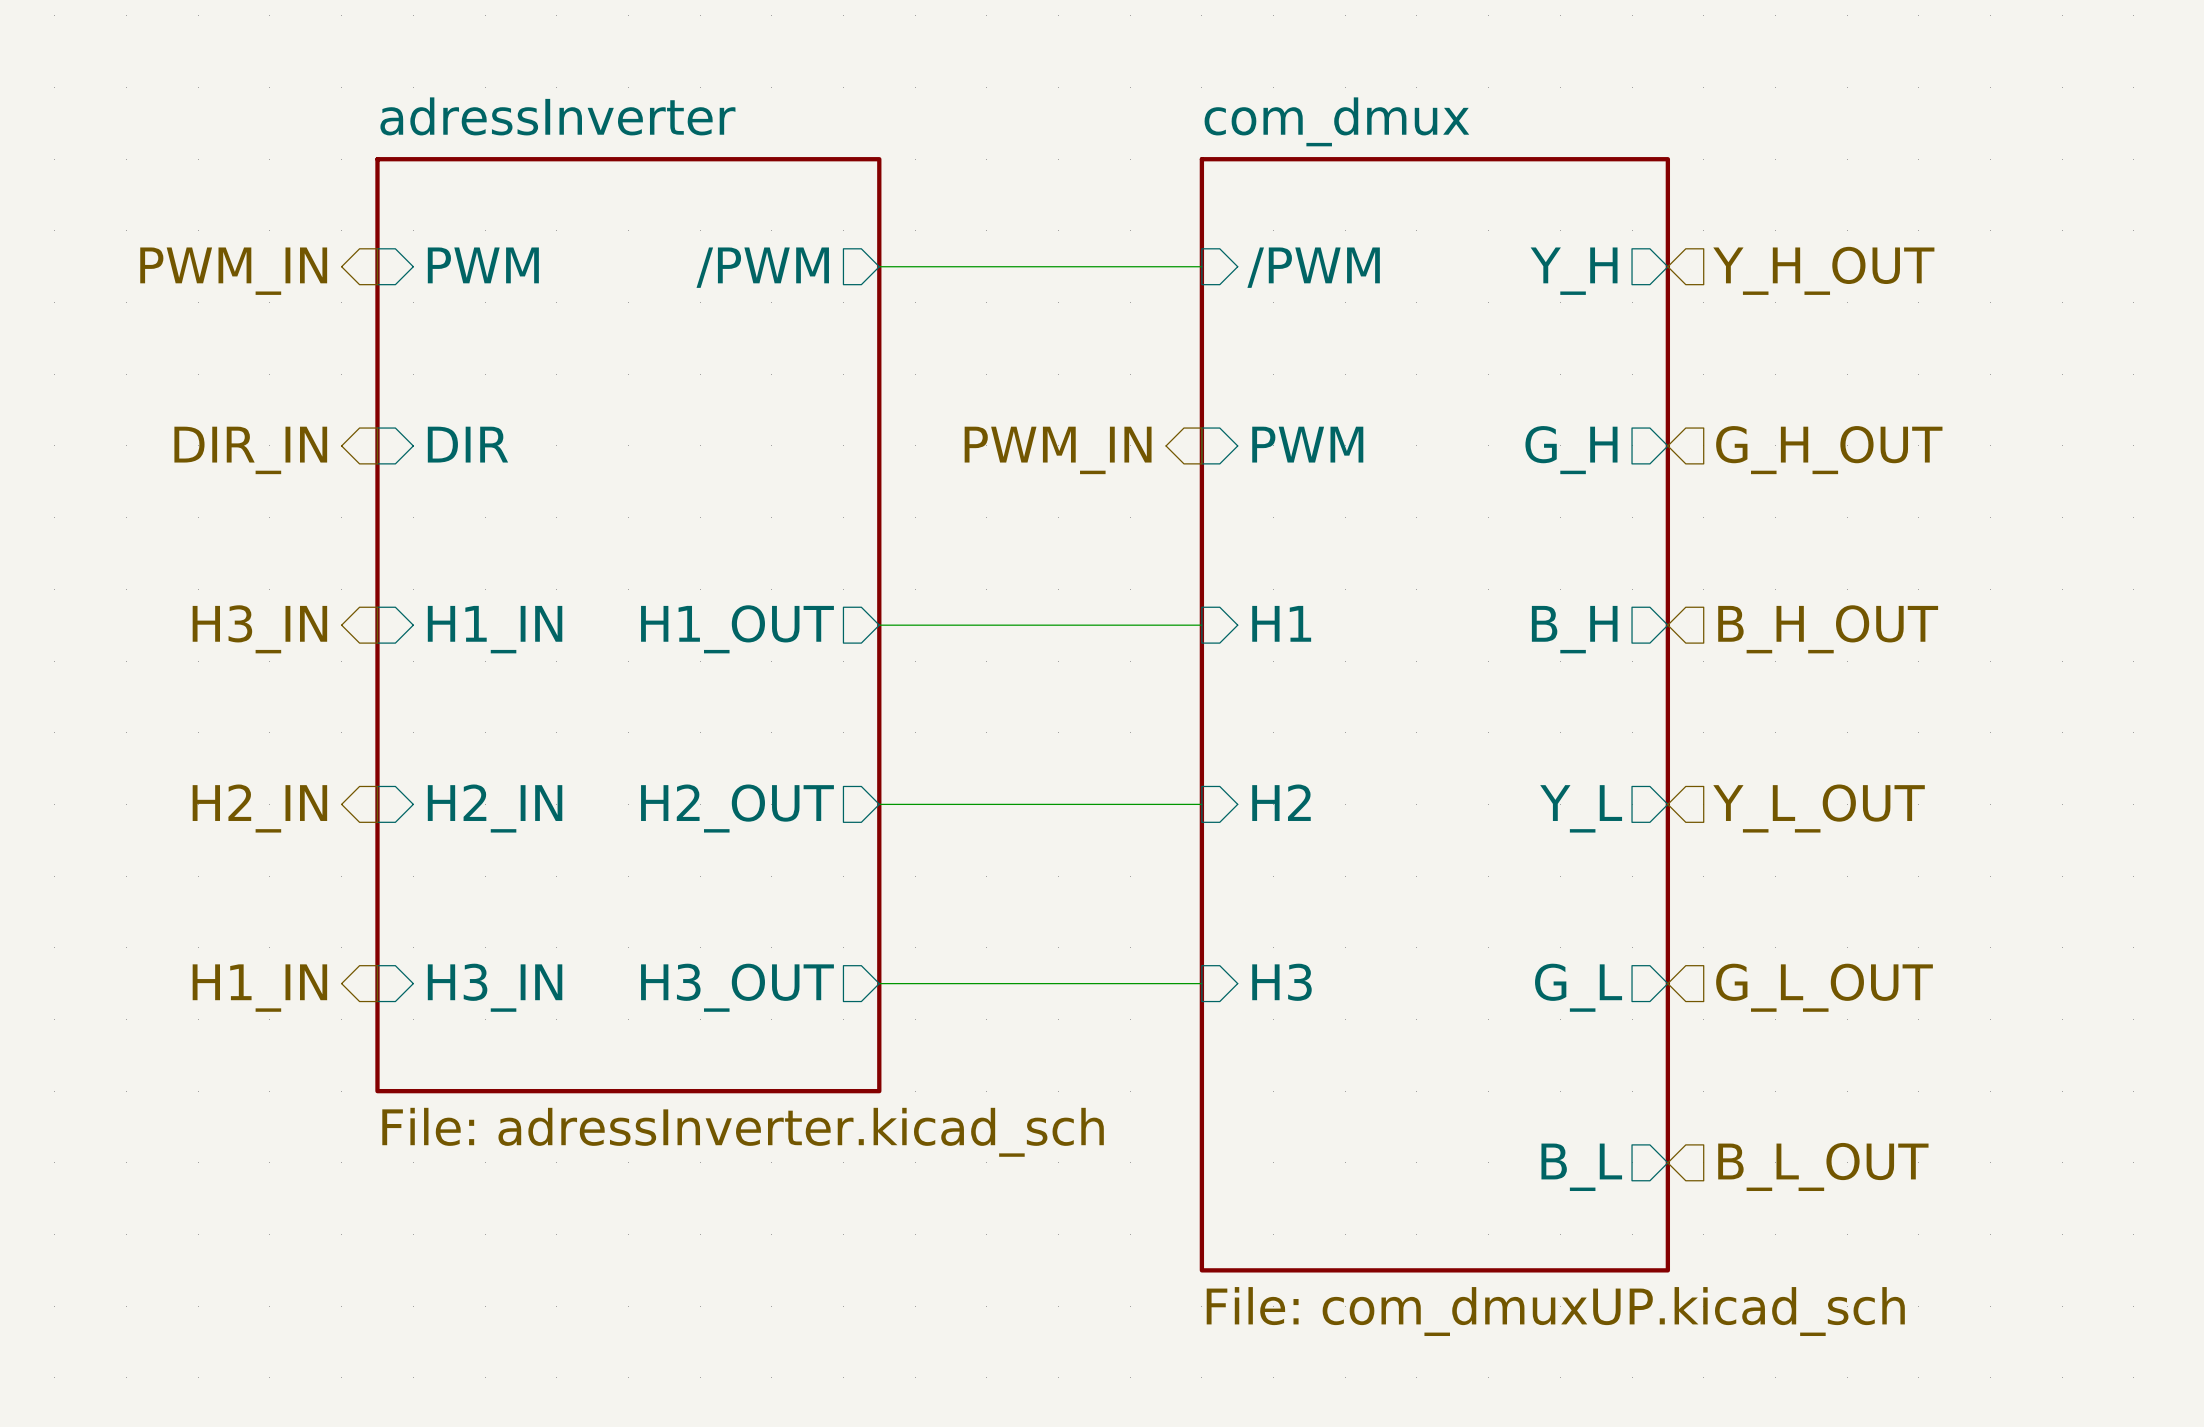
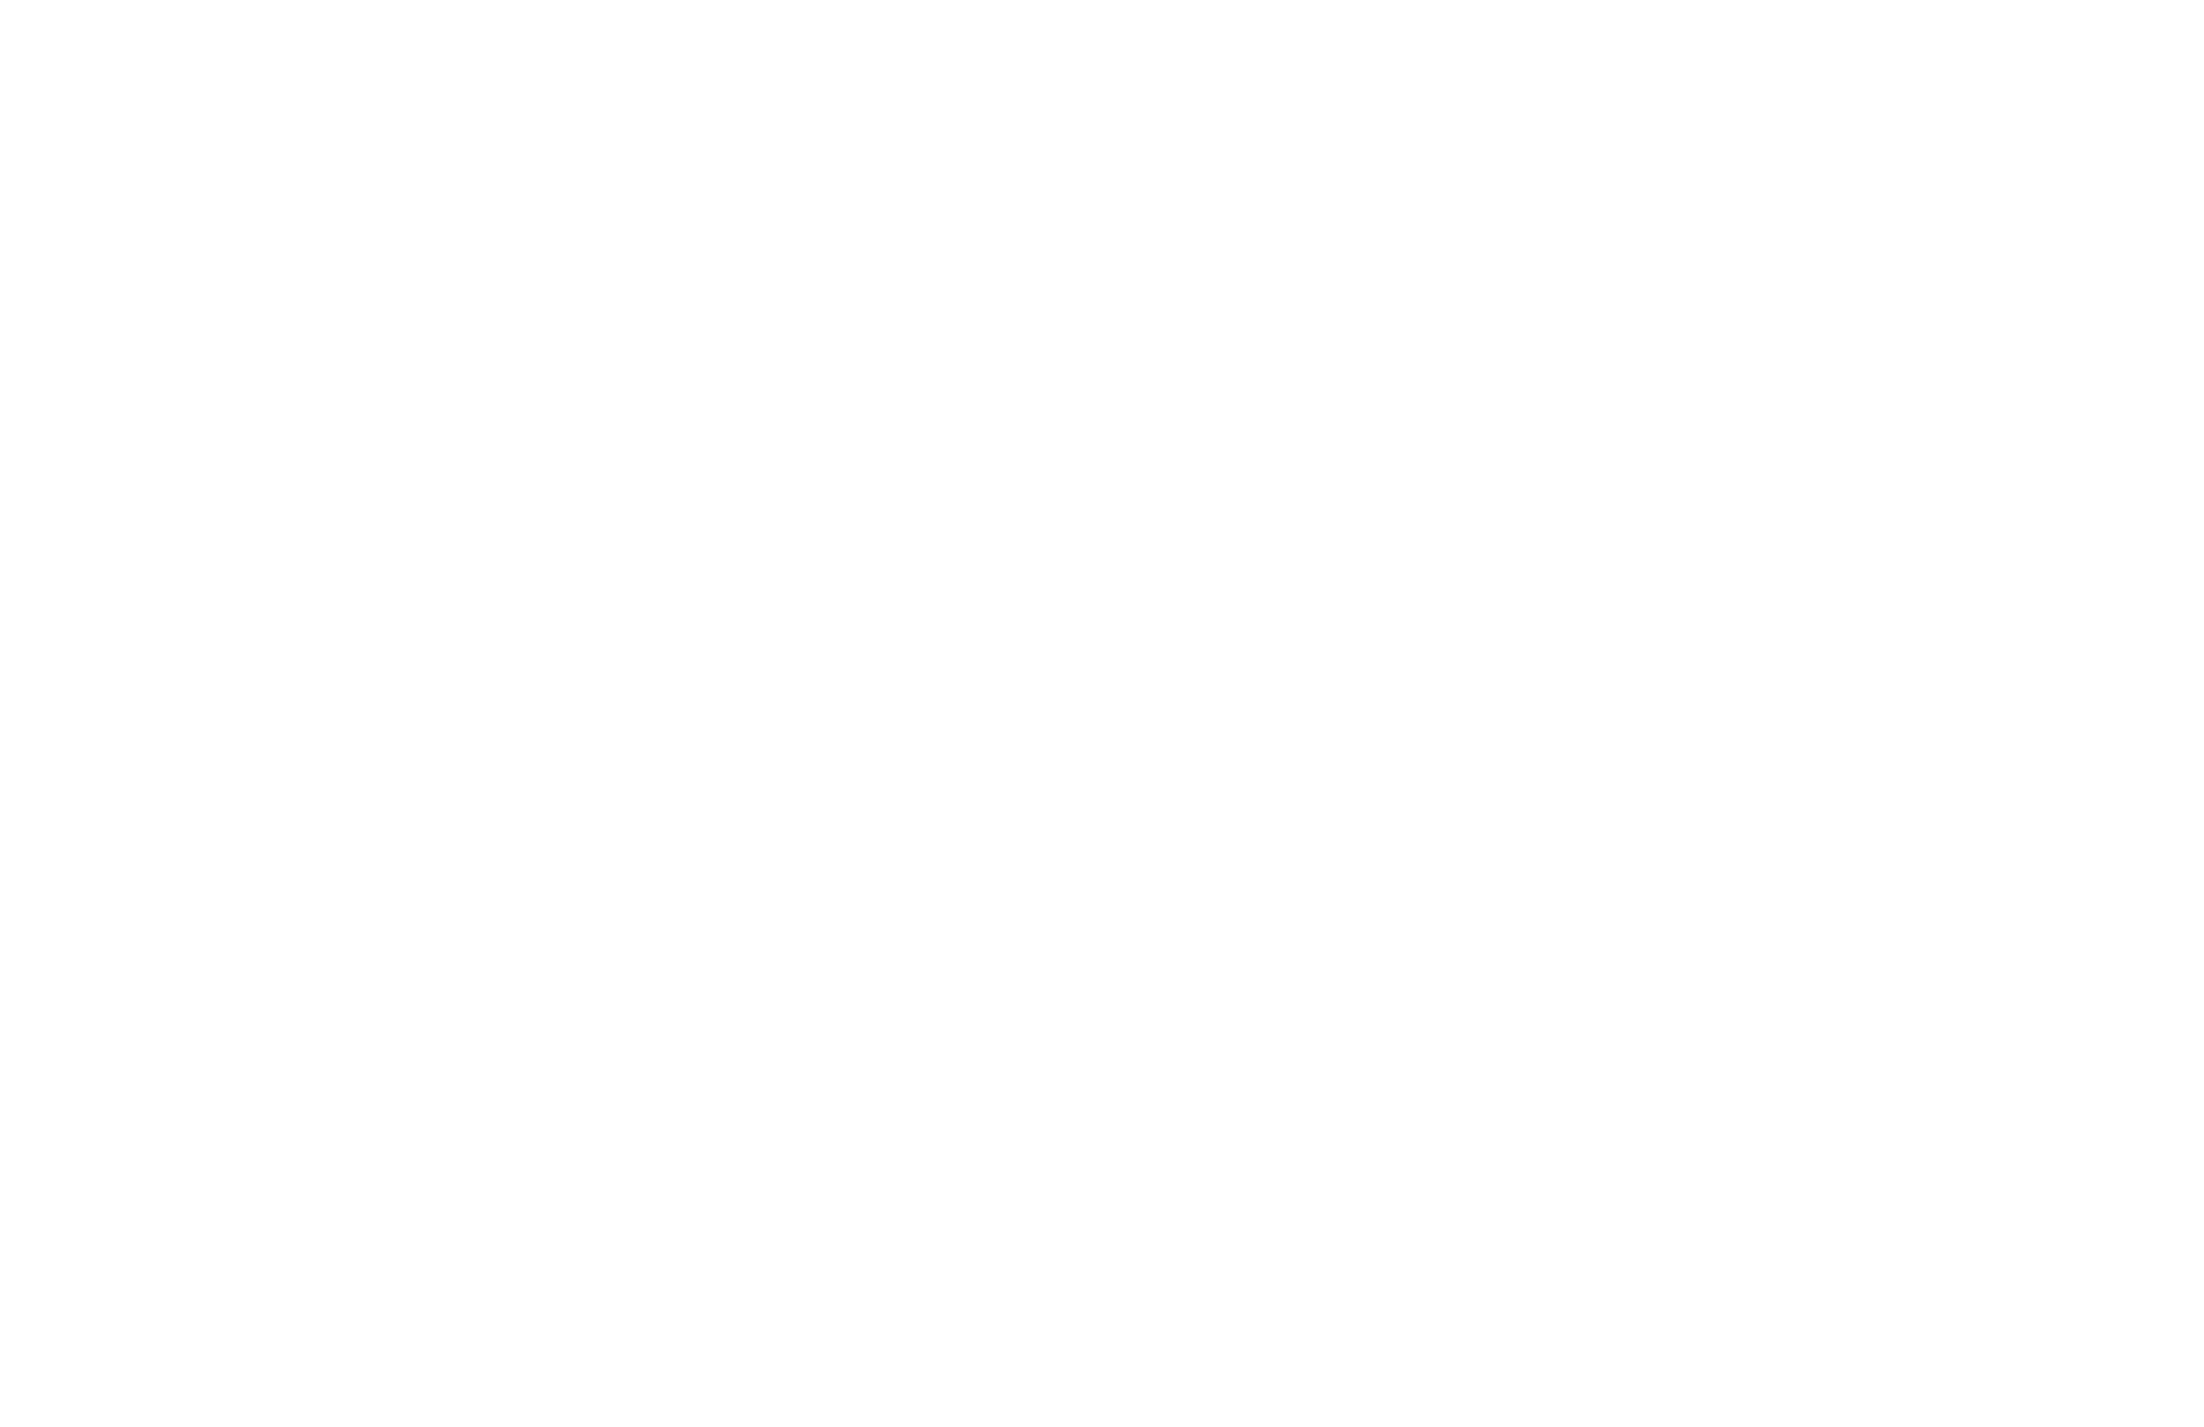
sheet pin: PWM (483, 265) -> none
wire: (879, 266) (1201, 266) -> none
sheet pin: /PWM (762, 267) -> none
sheet pin: /PWM (1313, 267) -> none
hierarchical label: Y_H_OUT (1823, 270) -> none
hierarchical label: PWM_IN (233, 271) -> none
sheet pin: Y_H (1574, 271) -> none
sheet pin: DIR (467, 444) -> none
sheet pin: PWM (1307, 444) -> none
hierarchical label: DIR_IN (250, 450) -> none
hierarchical label: PWM_IN (1058, 450) -> none
sheet pin: G_H (1571, 450) -> none
hierarchical label: G_H_OUT (1829, 450) -> none
sheet pin: H1 (1281, 623) -> none
sheet adressInverter: File: adressInverter.kicad_sch (628, 625) -> none
wire: (879, 625) (1201, 625) -> none
hierarchical label: H3_IN (259, 629) -> none
sheet pin: H1_IN (495, 629) -> none
sheet pin: H1_OUT (737, 629) -> none
sheet pin: B_H (1574, 629) -> none
hierarchical label: B_H_OUT (1828, 629) -> none
sheet com_dmux: File: com_dmuxUP.kicad_sch (1434, 714) -> none
sheet pin: H2 (1281, 802) -> none
wire: (879, 804) (1201, 804) -> none
hierarchical label: H2_IN (259, 808) -> none
sheet pin: H2_IN (495, 808) -> none
sheet pin: H2_OUT (737, 808) -> none
sheet pin: Y_L (1581, 808) -> none
hierarchical label: Y_L_OUT (1819, 808) -> none
sheet pin: H3 (1281, 982) -> none
wire: (879, 983) (1201, 983) -> none
sheet pin: H3_IN (495, 987) -> none
sheet pin: H3_OUT (737, 987) -> none
sheet pin: G_L (1578, 987) -> none
hierarchical label: G_L_OUT (1824, 987) -> none
hierarchical label: H1_IN (259, 988) -> none
hierarchical label: B_L_OUT (1823, 1166) -> none
sheet pin: B_L (1581, 1167) -> none

